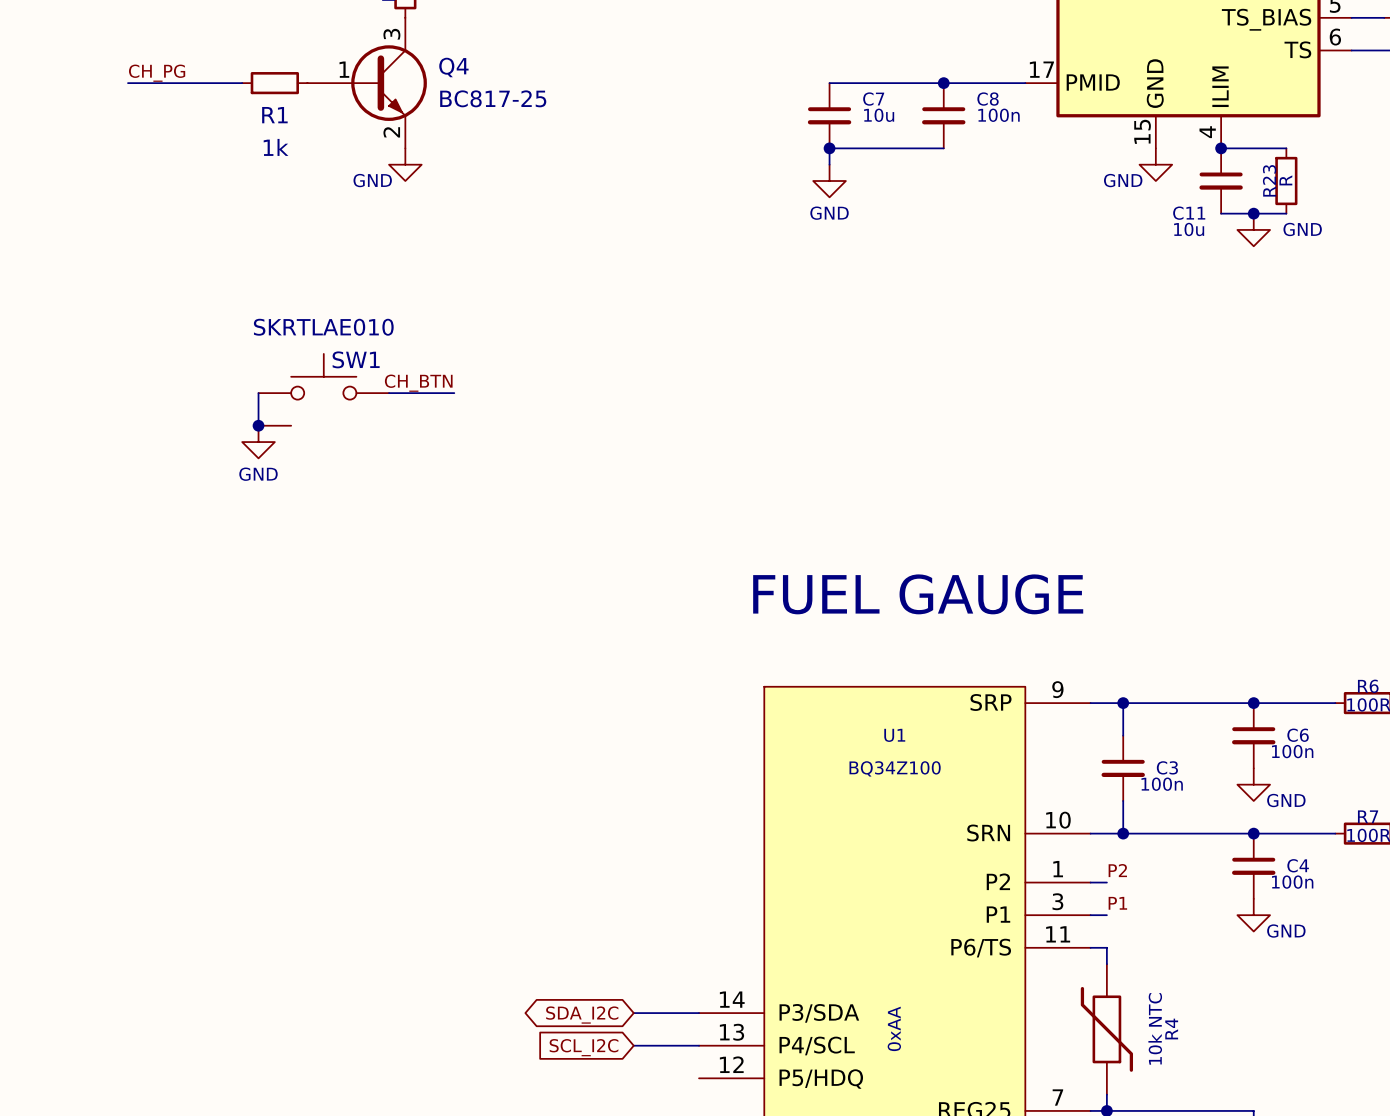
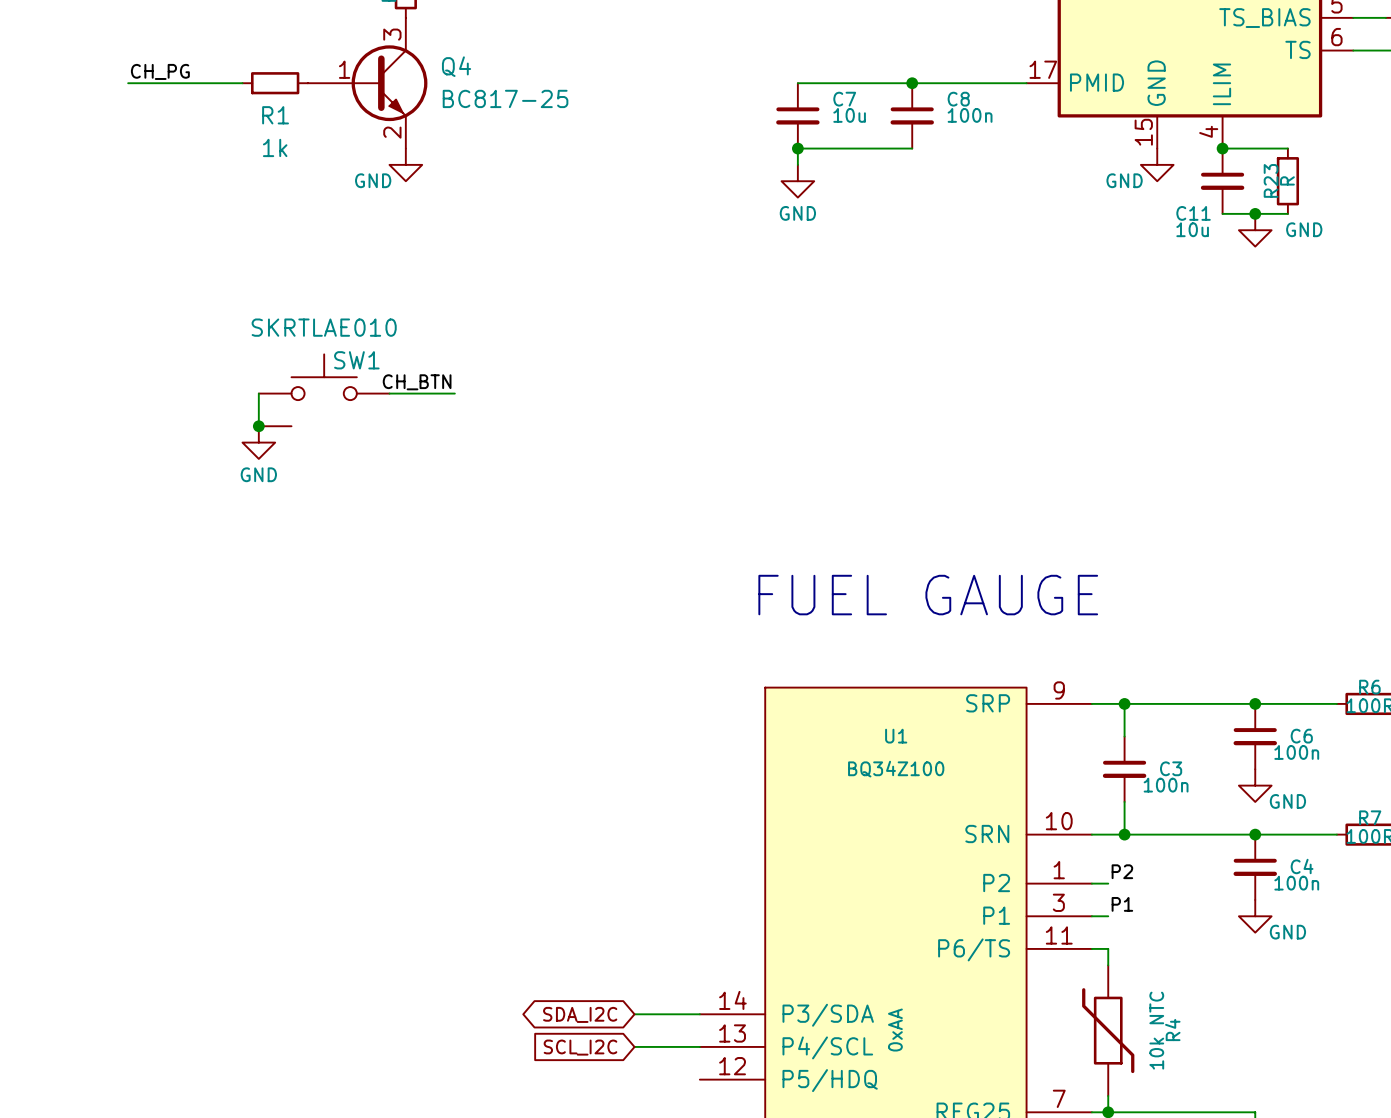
junction position: (943, 83) -> (912, 83)
C7 position: (829, 115) -> (797, 115)
C8 position: (943, 115) -> (912, 115)
wire: (829, 148) (829, 164) -> (830, 148) (797, 148) (797, 164)
junction position: (829, 148) -> (797, 148)
wire: (911, 148) (943, 148) -> (797, 83) (830, 83)
power symbol position: GND (829, 181) -> GND (797, 181)

